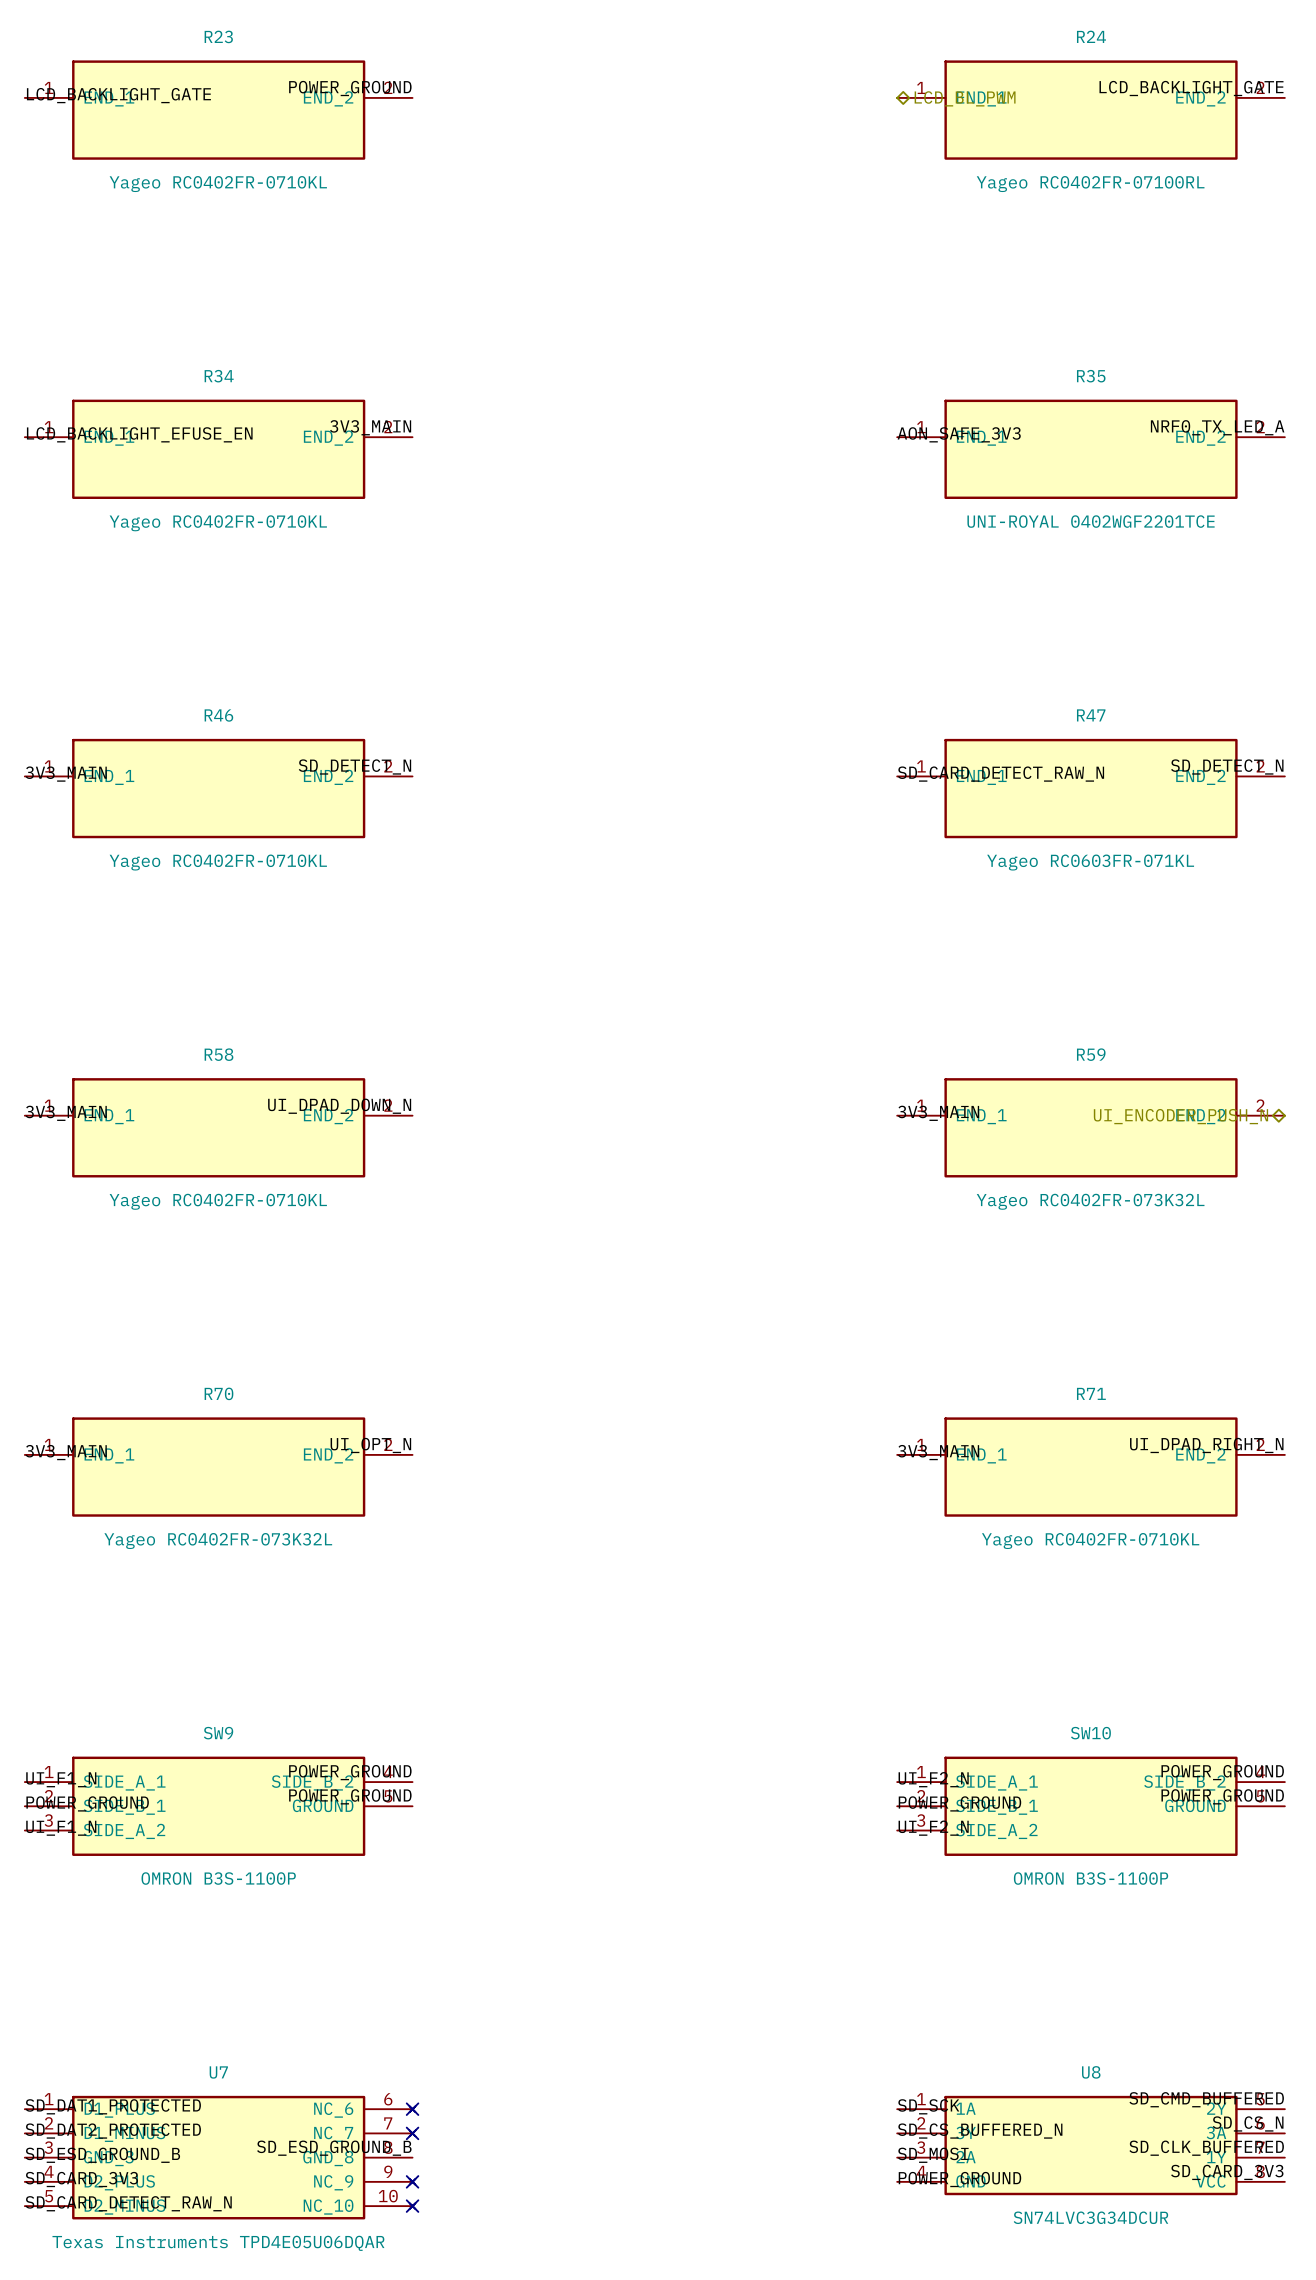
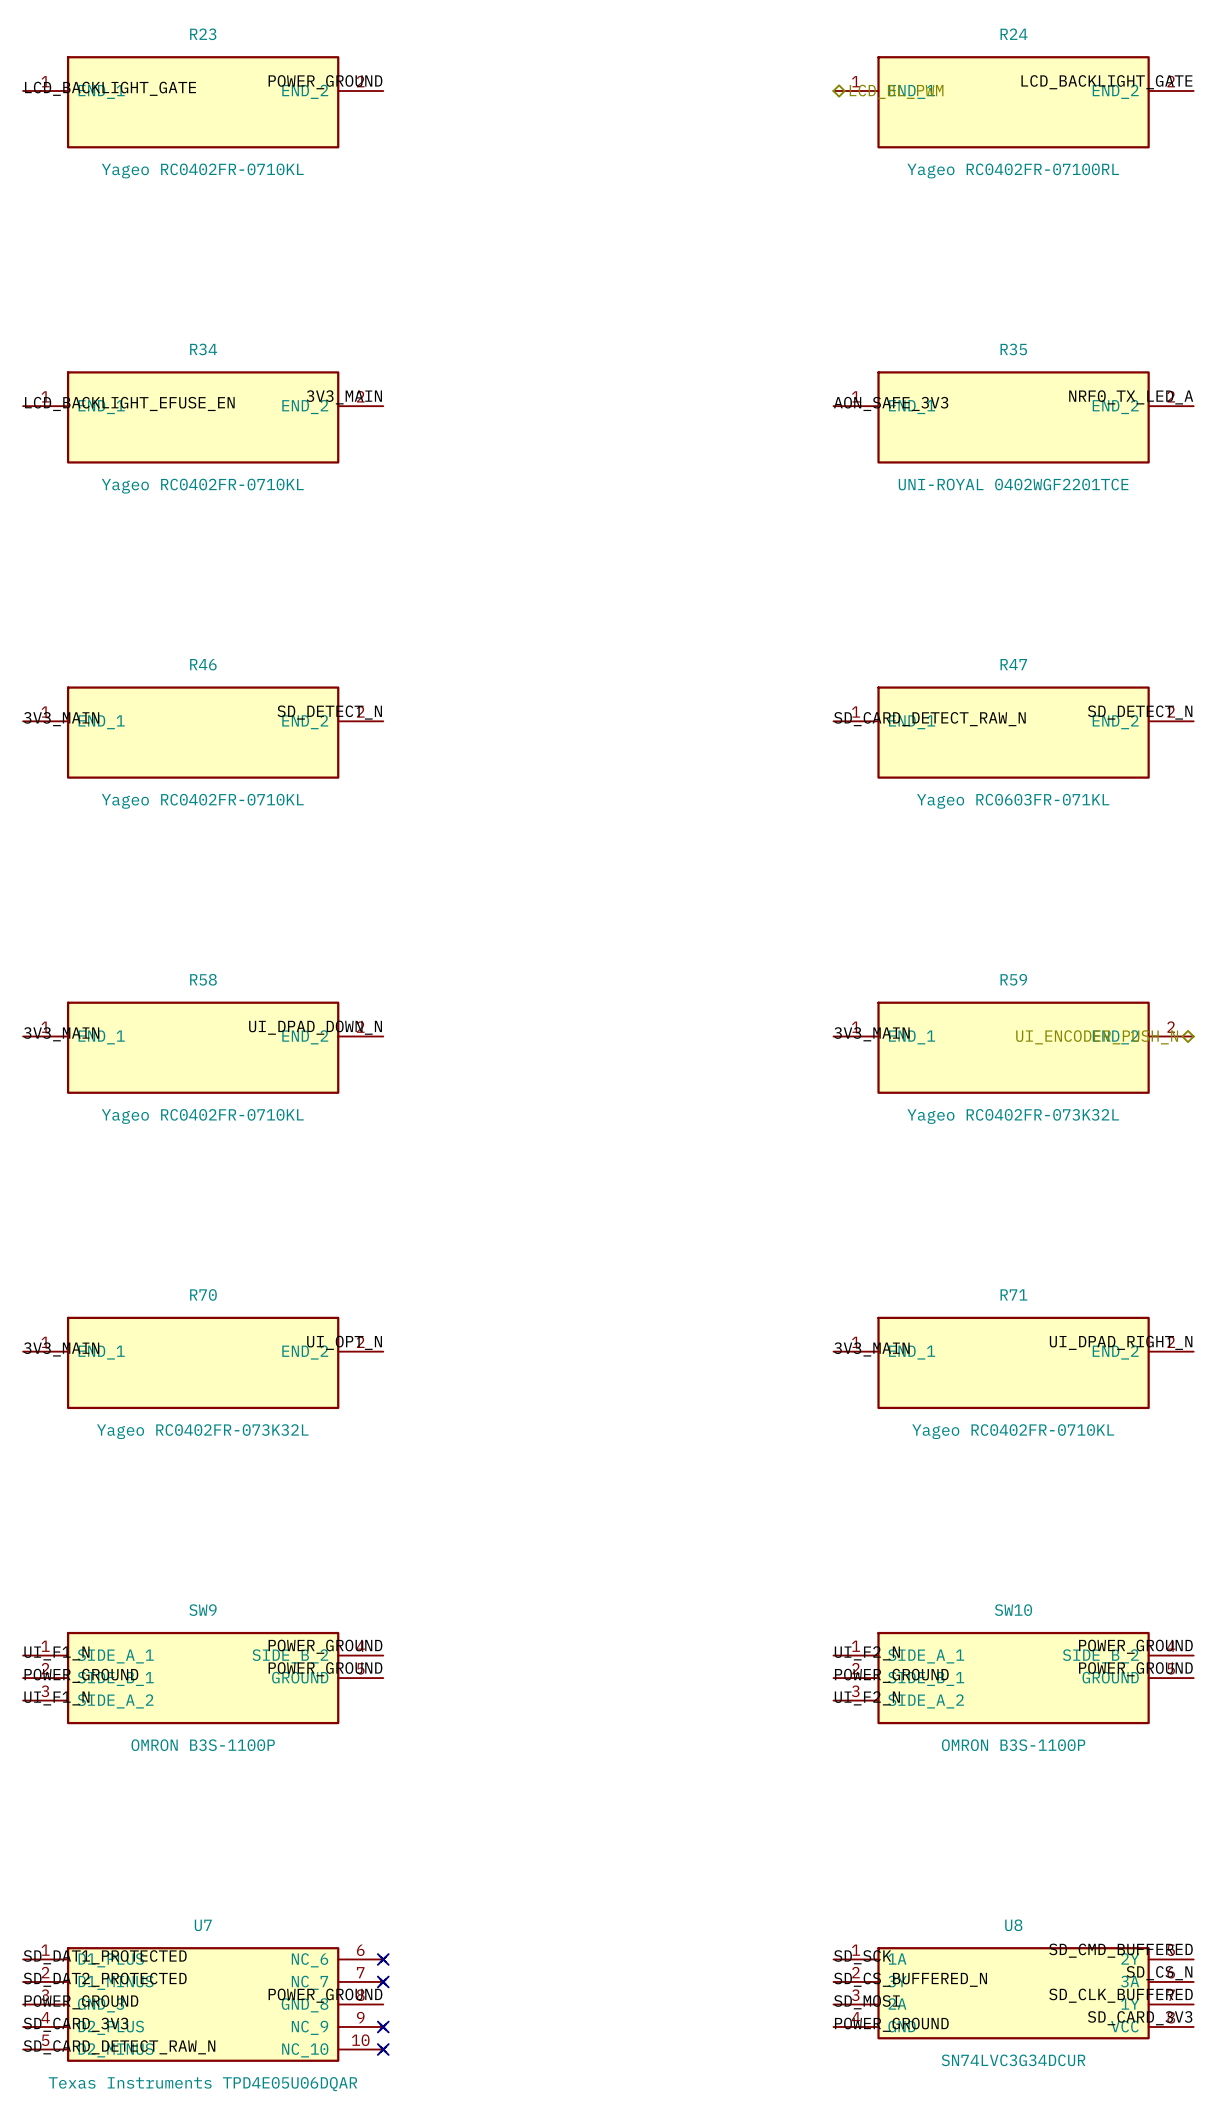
label: SD_ESD_GROUND_B (334, 2148) -> POWER_GROUND (325, 1995)
label: SD_ESD_GROUND_B (102, 2155) -> POWER_GROUND (81, 2002)

